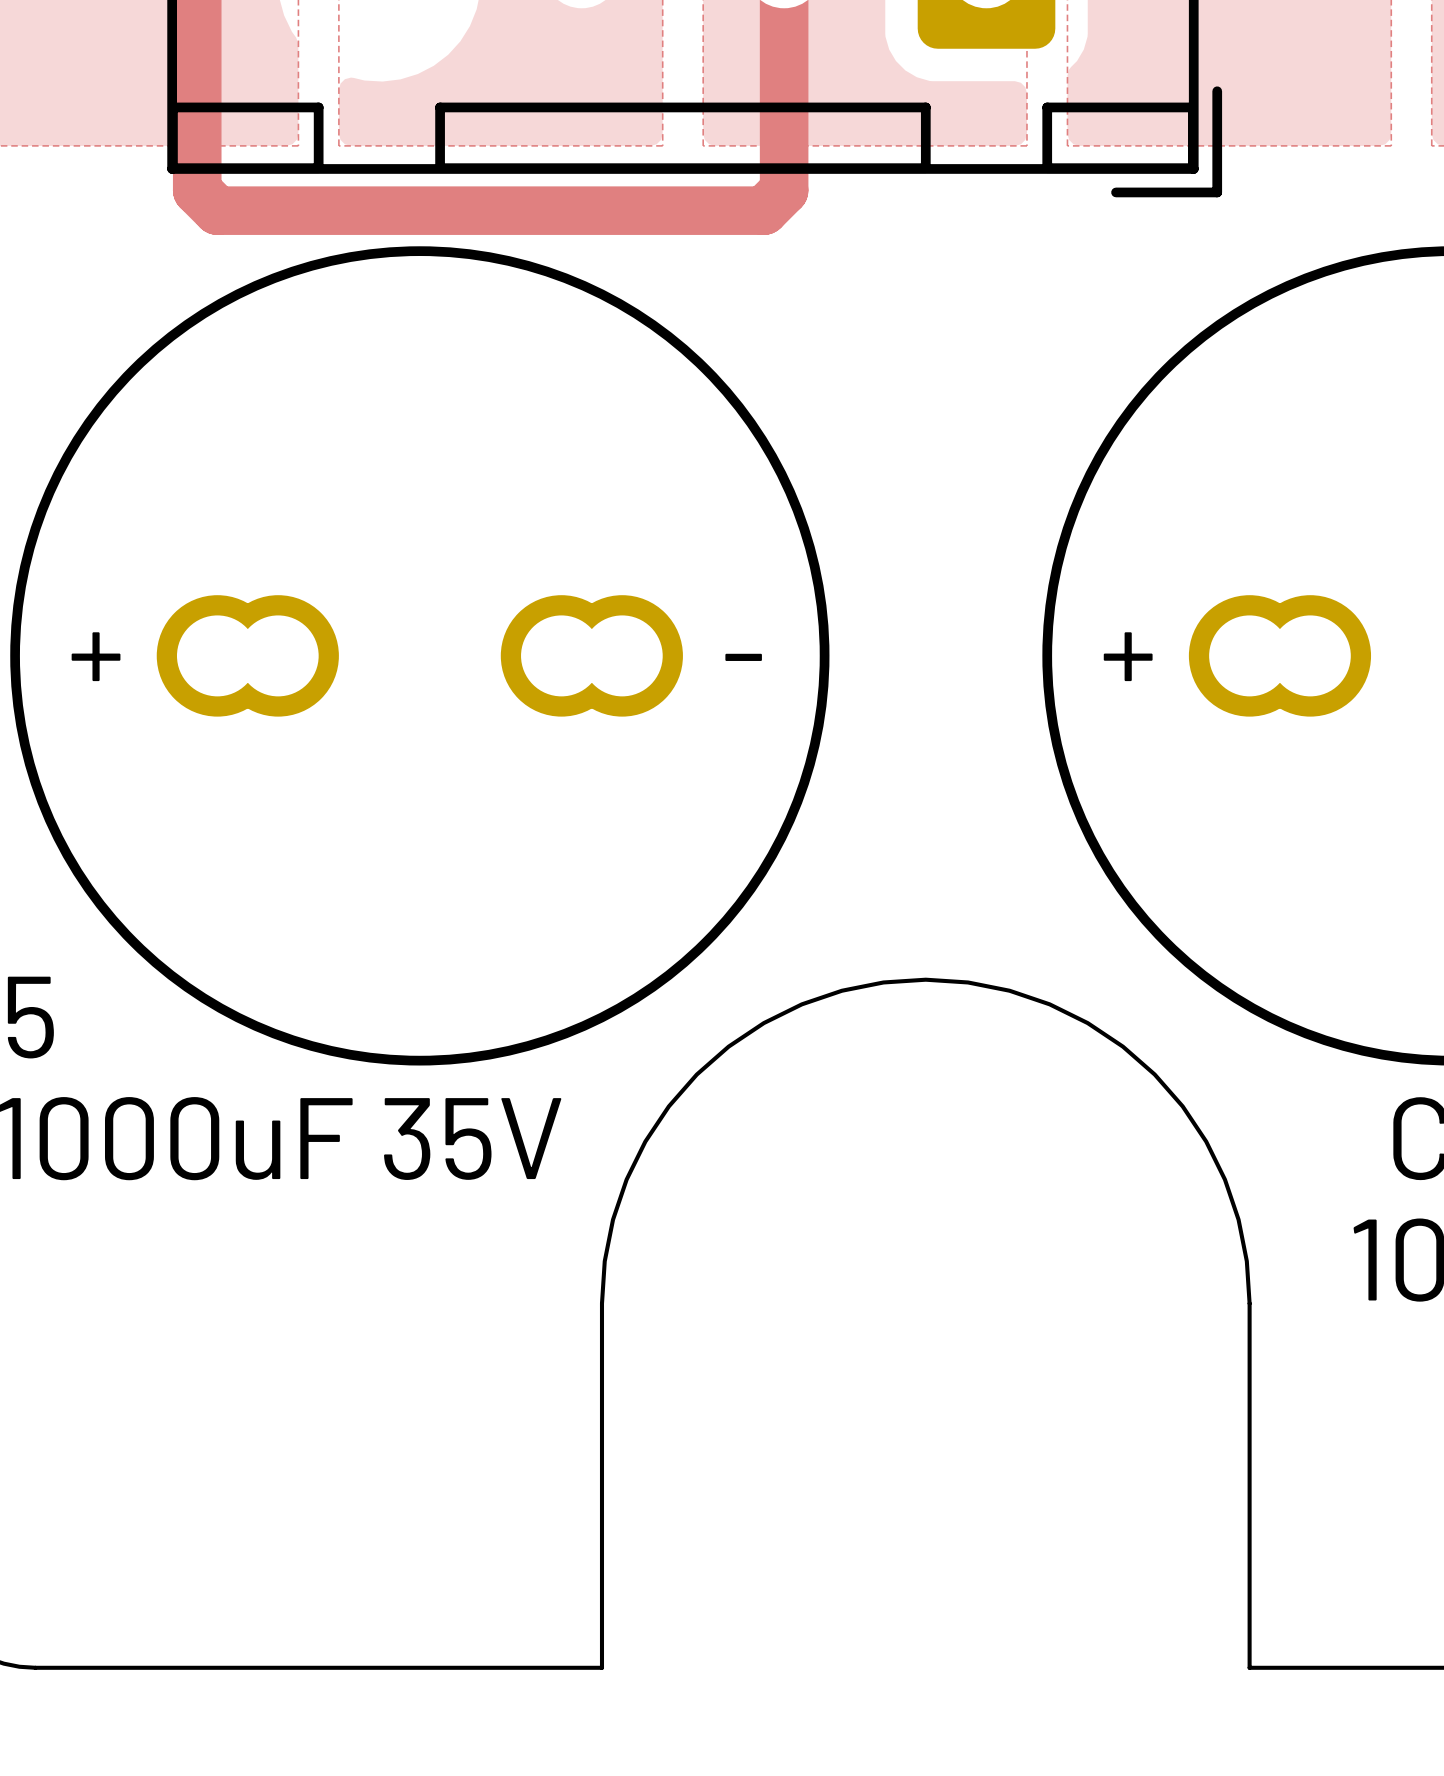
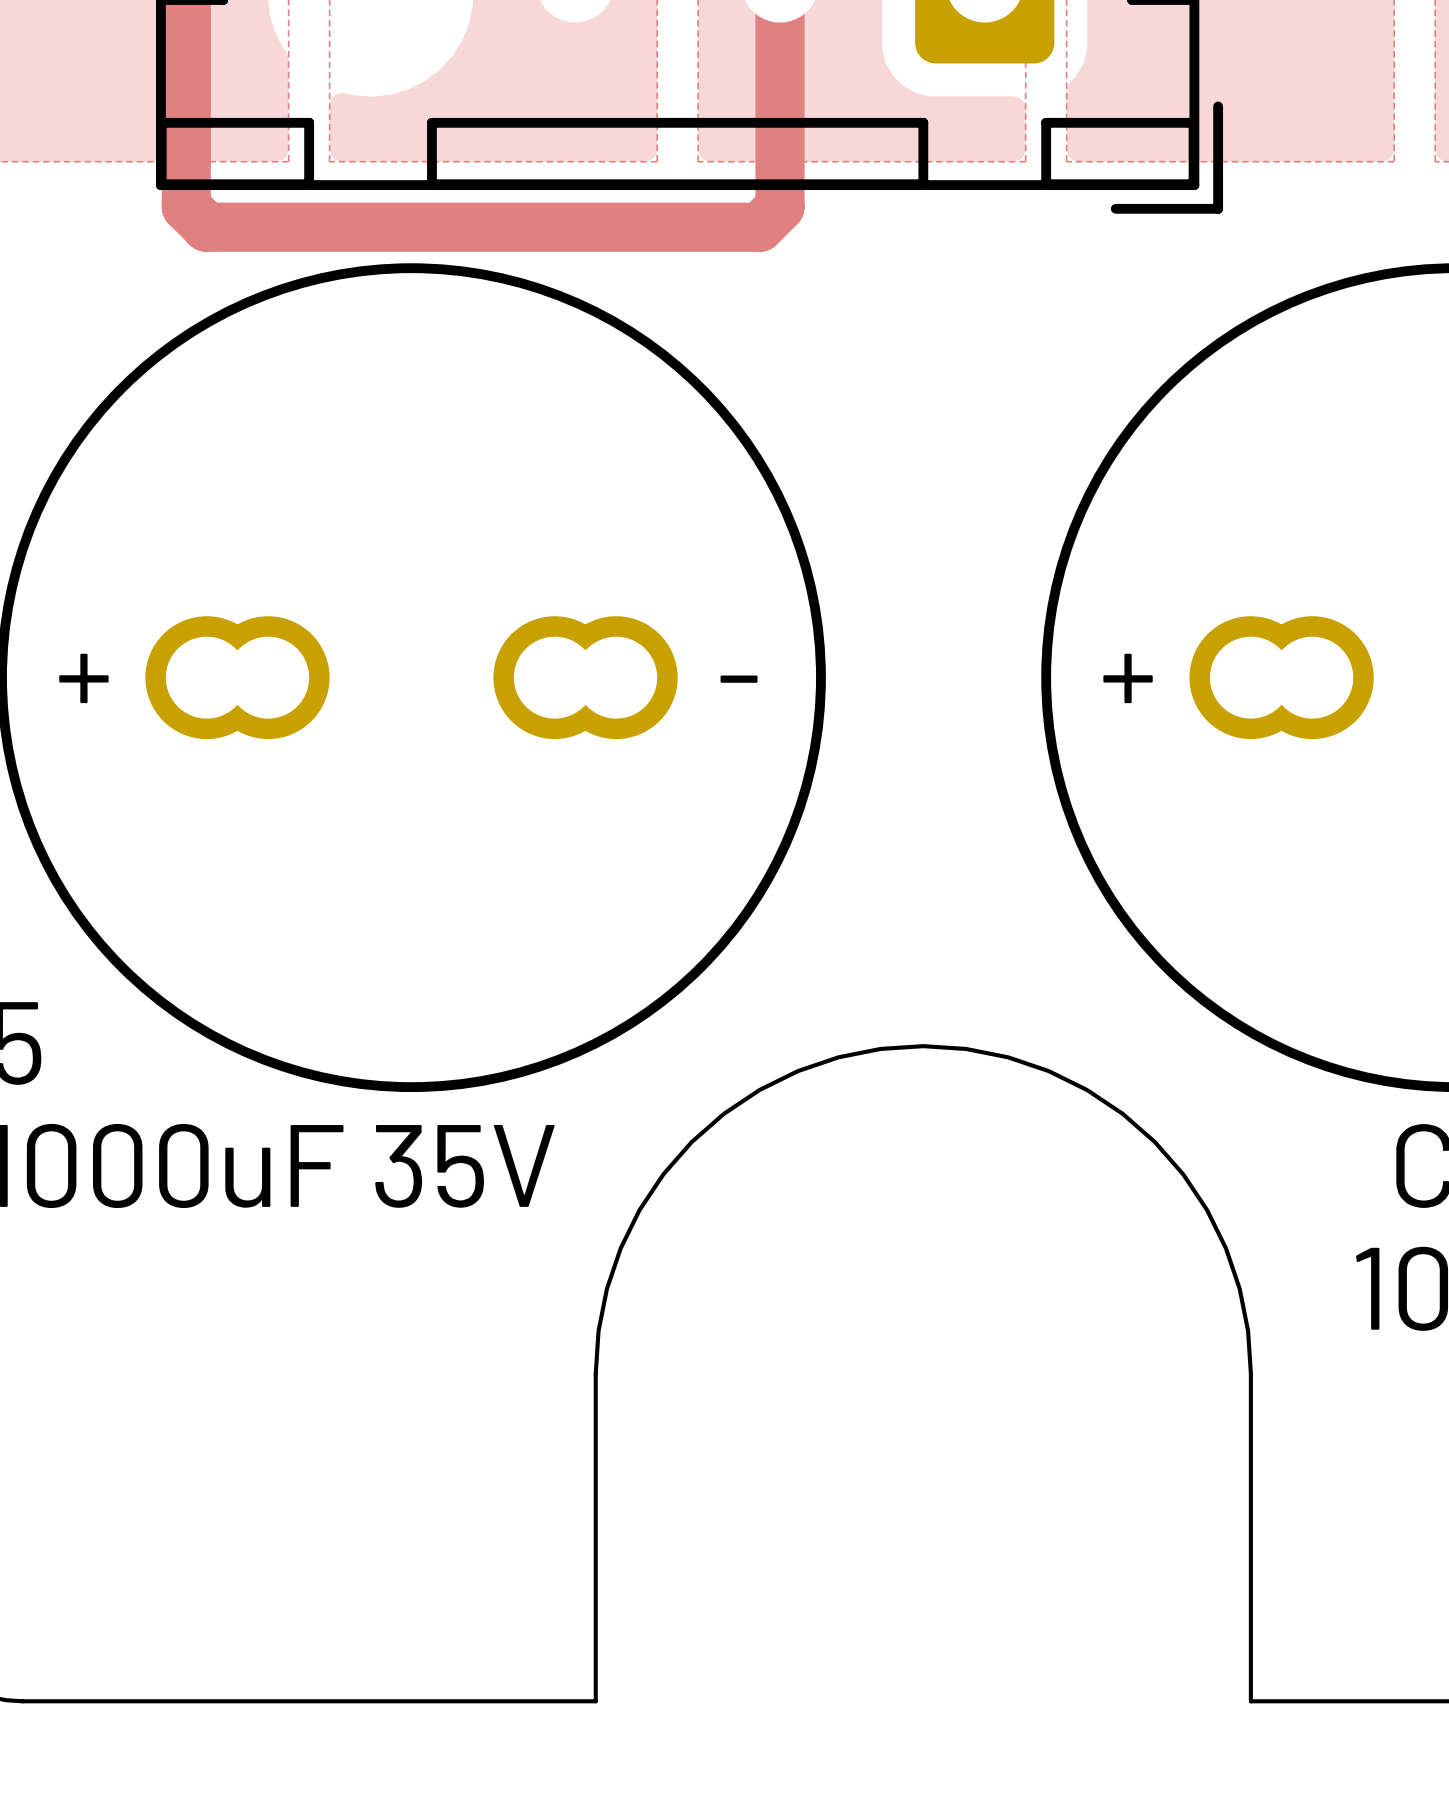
board edge: (601, 1343) (604, 1261) (613, 1219) (626, 1179) (645, 1141) (668, 1106) (696, 1074) (728, 1046) (763, 1023) (801, 1004) (841, 990) (883, 982) (925, 979) (968, 982) (1009, 990) (1049, 1004) (1087, 1023) (1122, 1046) (1154, 1074) (1182, 1106) (1206, 1141) (1224, 1179) (1238, 1219) (1246, 1261) (1249, 1343) -> (595, 1373) (598, 1330) (606, 1288) (620, 1248) (639, 1209) (663, 1174) (691, 1142) (723, 1113) (759, 1090) (797, 1071) (838, 1057) (880, 1048) (923, 1046) (966, 1048) (1008, 1057) (1048, 1071) (1087, 1090) (1122, 1113) (1154, 1142) (1183, 1174) (1207, 1209) (1225, 1248) (1239, 1288) (1248, 1330) (1250, 1373)

